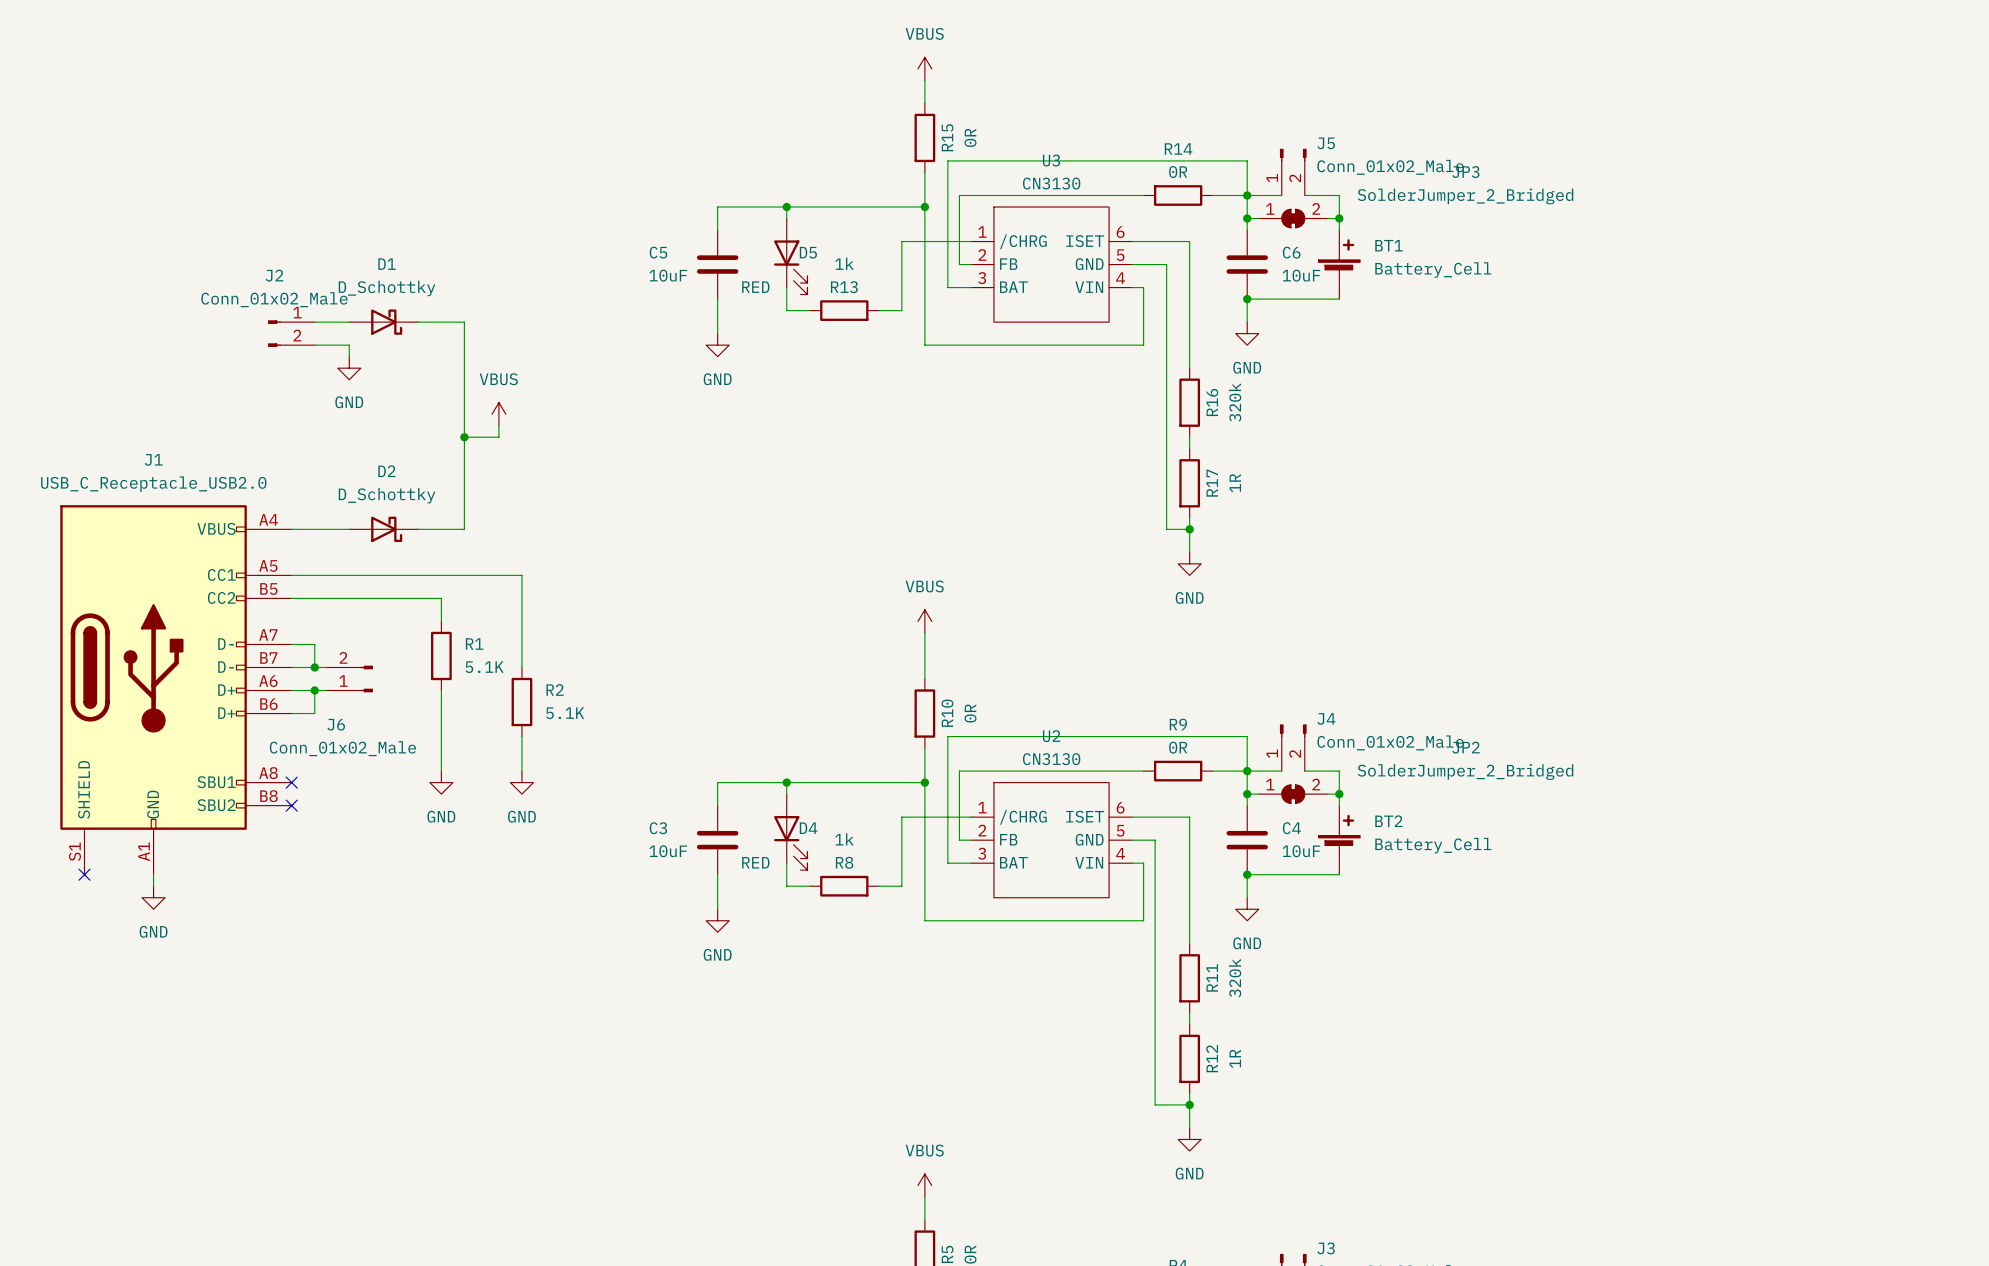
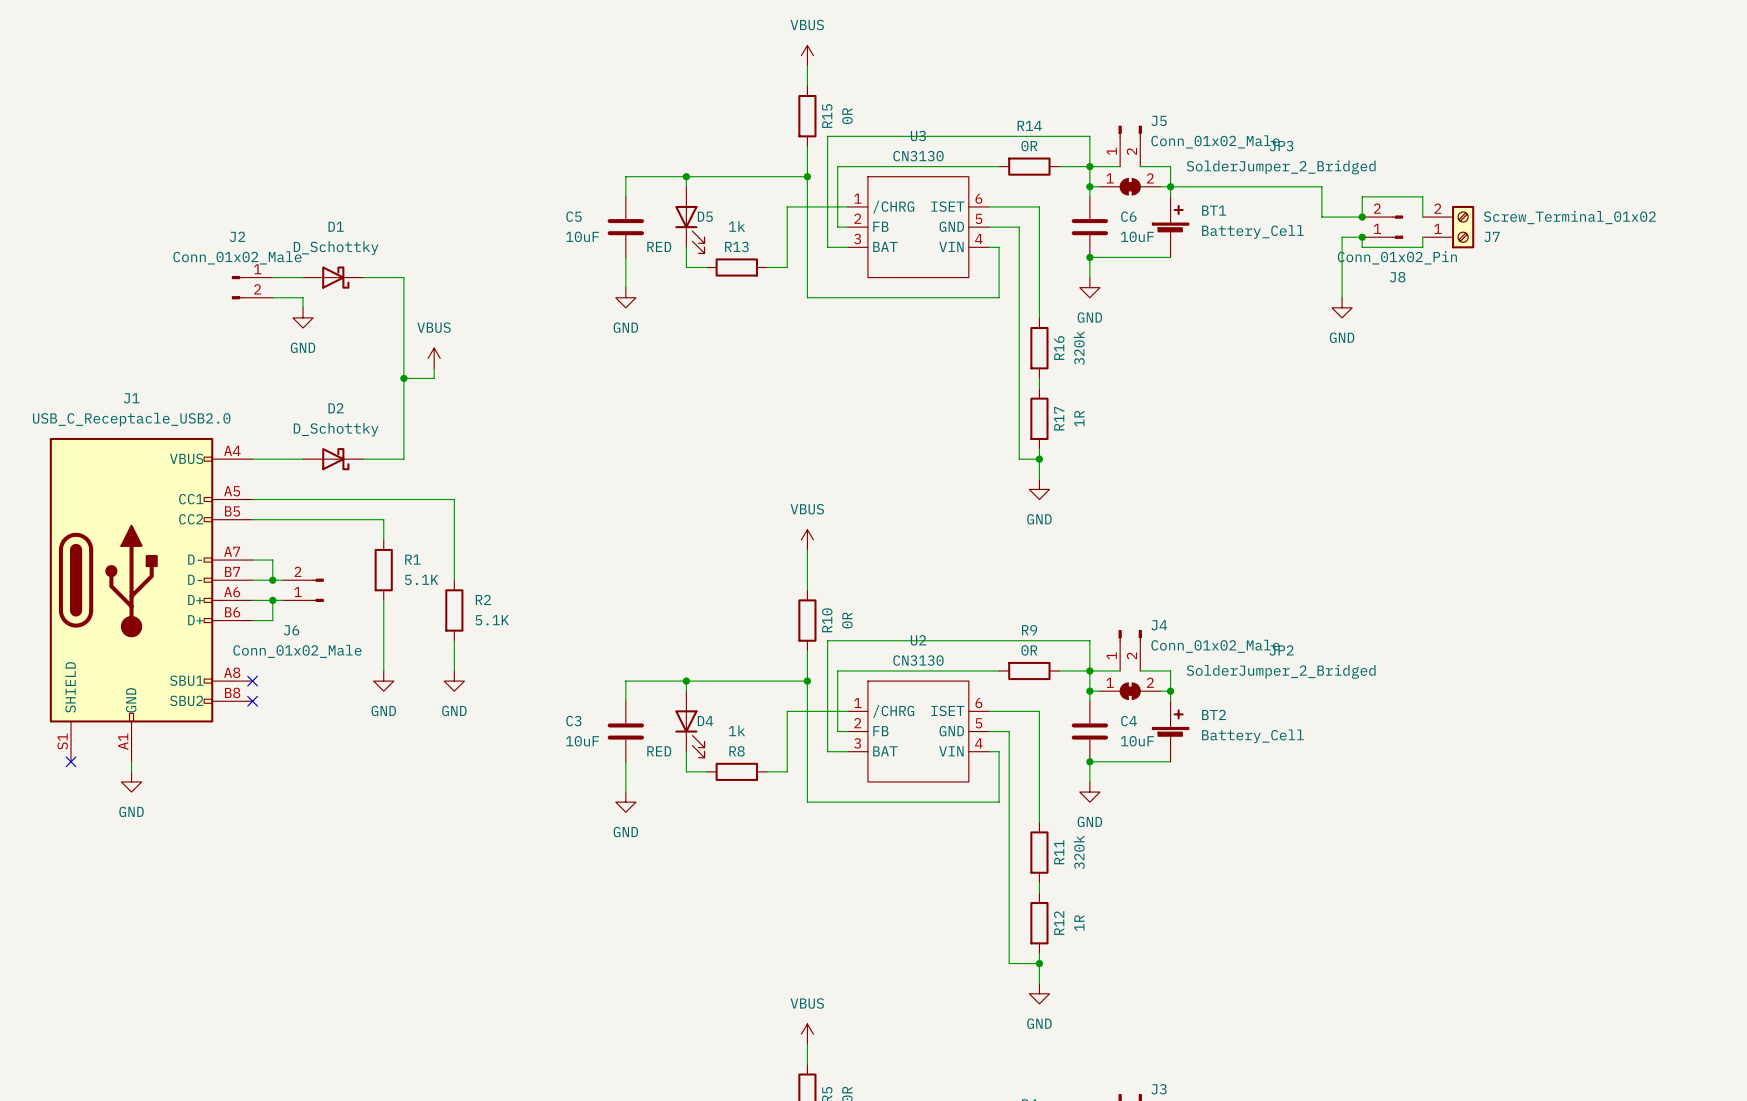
wire: none -> (1170, 186) (1321, 186) (1321, 217) (1362, 217) (1362, 196) (1422, 196) (1422, 217)
junction: none -> (1362, 217)
J8: none -> Conn_01x02_Pin (1382, 227)
J7: none -> Screw_Terminal_01x02 (1448, 227)
junction: none -> (1362, 237)
wire: none -> (1422, 237) (1422, 247) (1362, 247) (1362, 237) (1342, 237) (1342, 297)
power symbol: none -> GND (1342, 307)

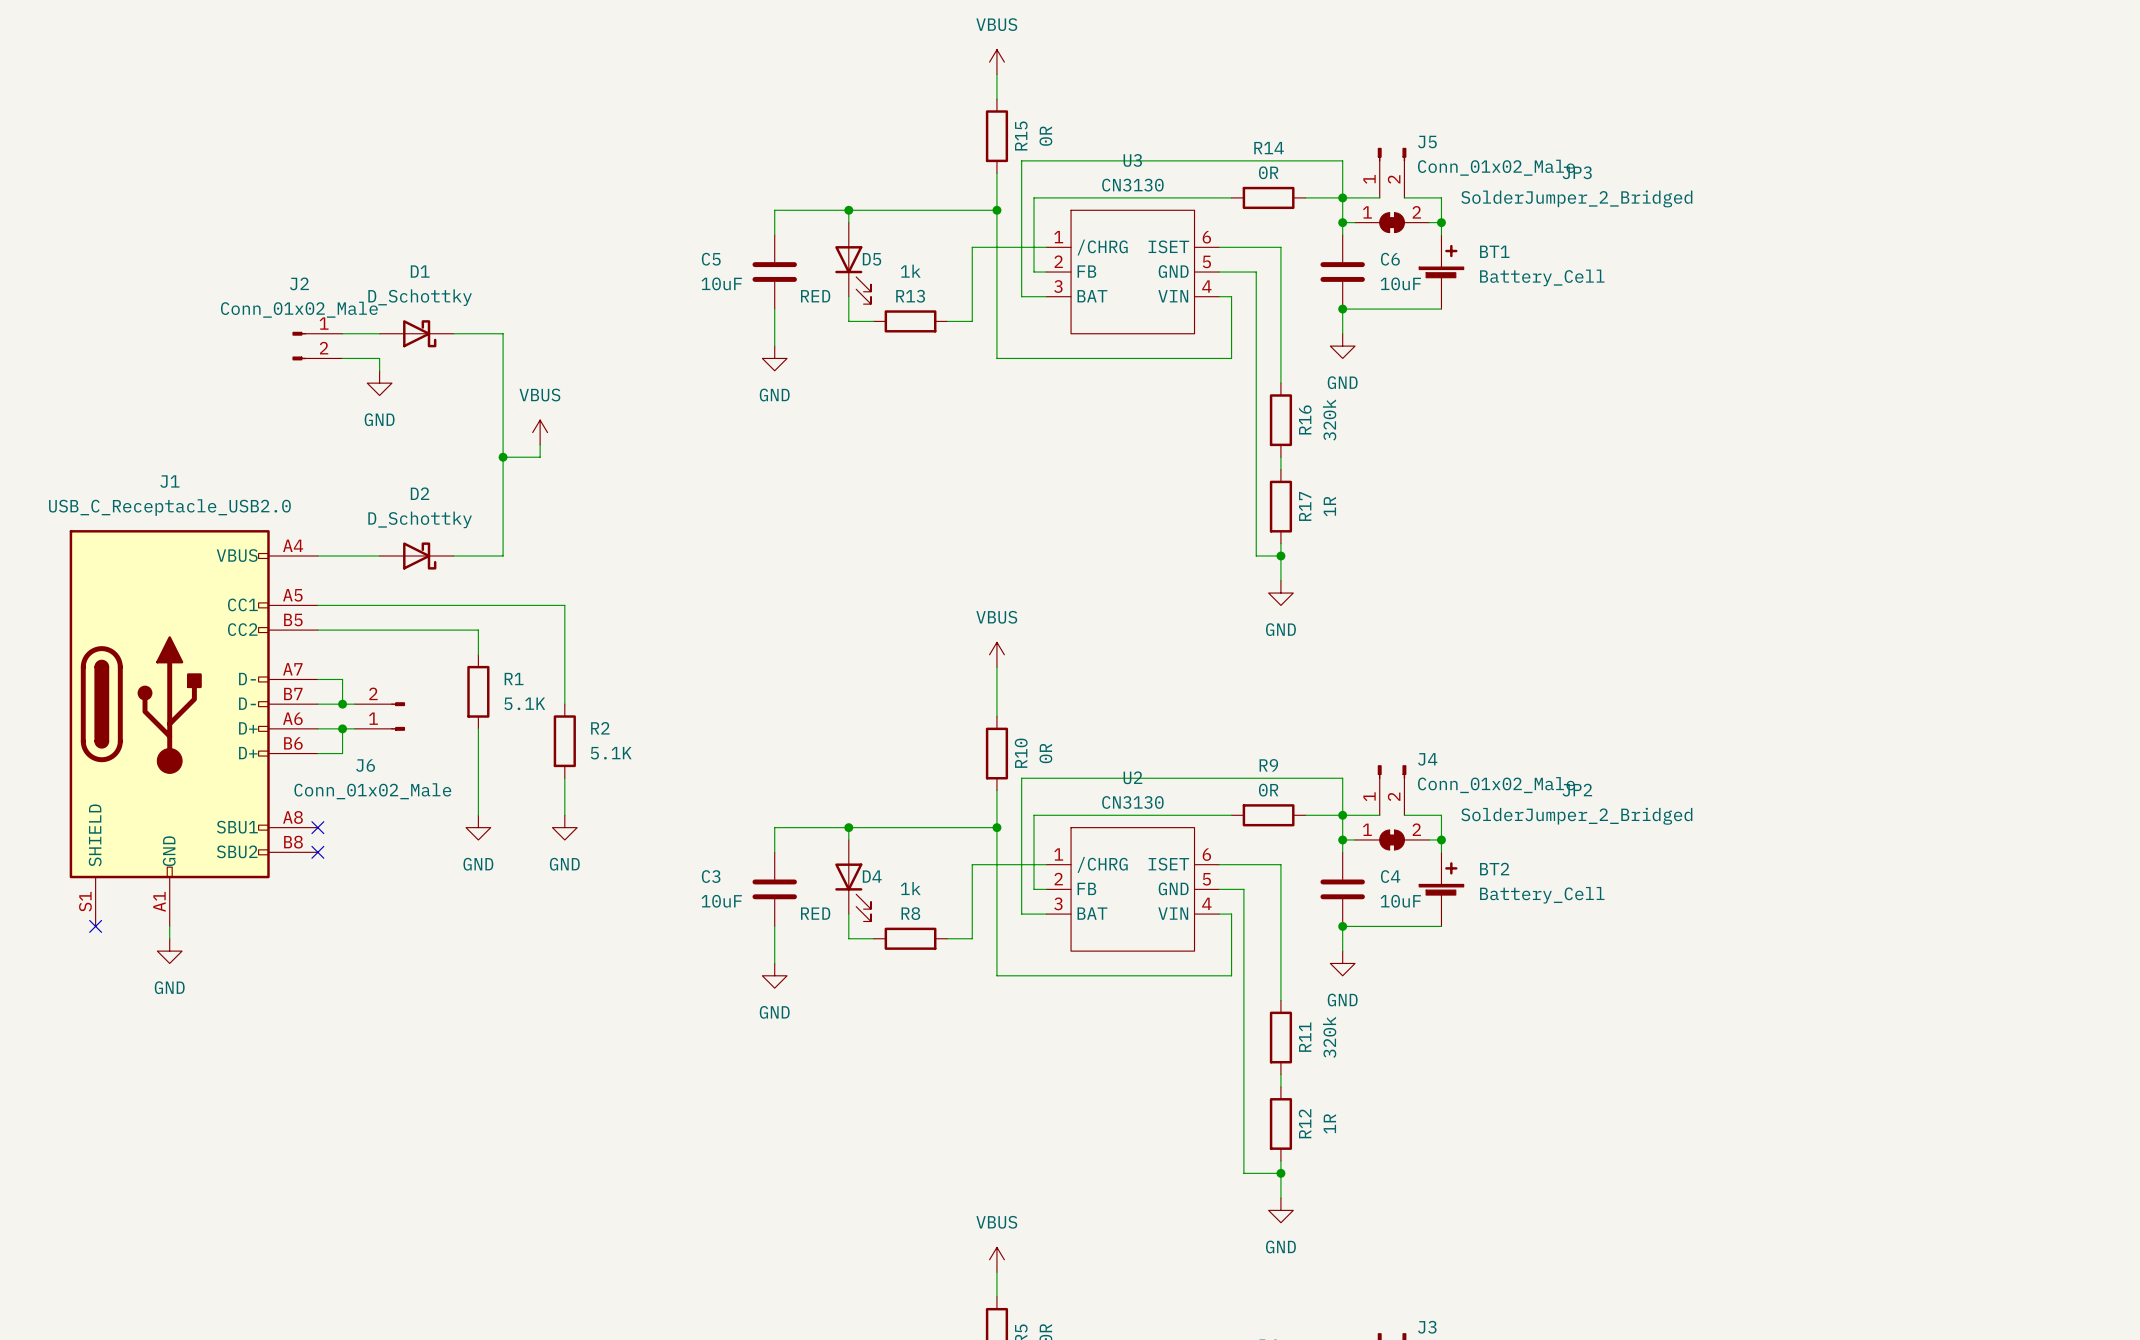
wire: (1170, 186) (1321, 186) (1321, 217) (1362, 217) (1362, 196) (1422, 196) (1422, 217) -> none
junction: (1362, 217) -> none
J8: Conn_01x02_Pin (1382, 227) -> none
J7: Screw_Terminal_01x02 (1448, 227) -> none
junction: (1362, 237) -> none
wire: (1422, 237) (1422, 247) (1362, 247) (1362, 237) (1342, 237) (1342, 297) -> none
power symbol: GND (1342, 307) -> none

